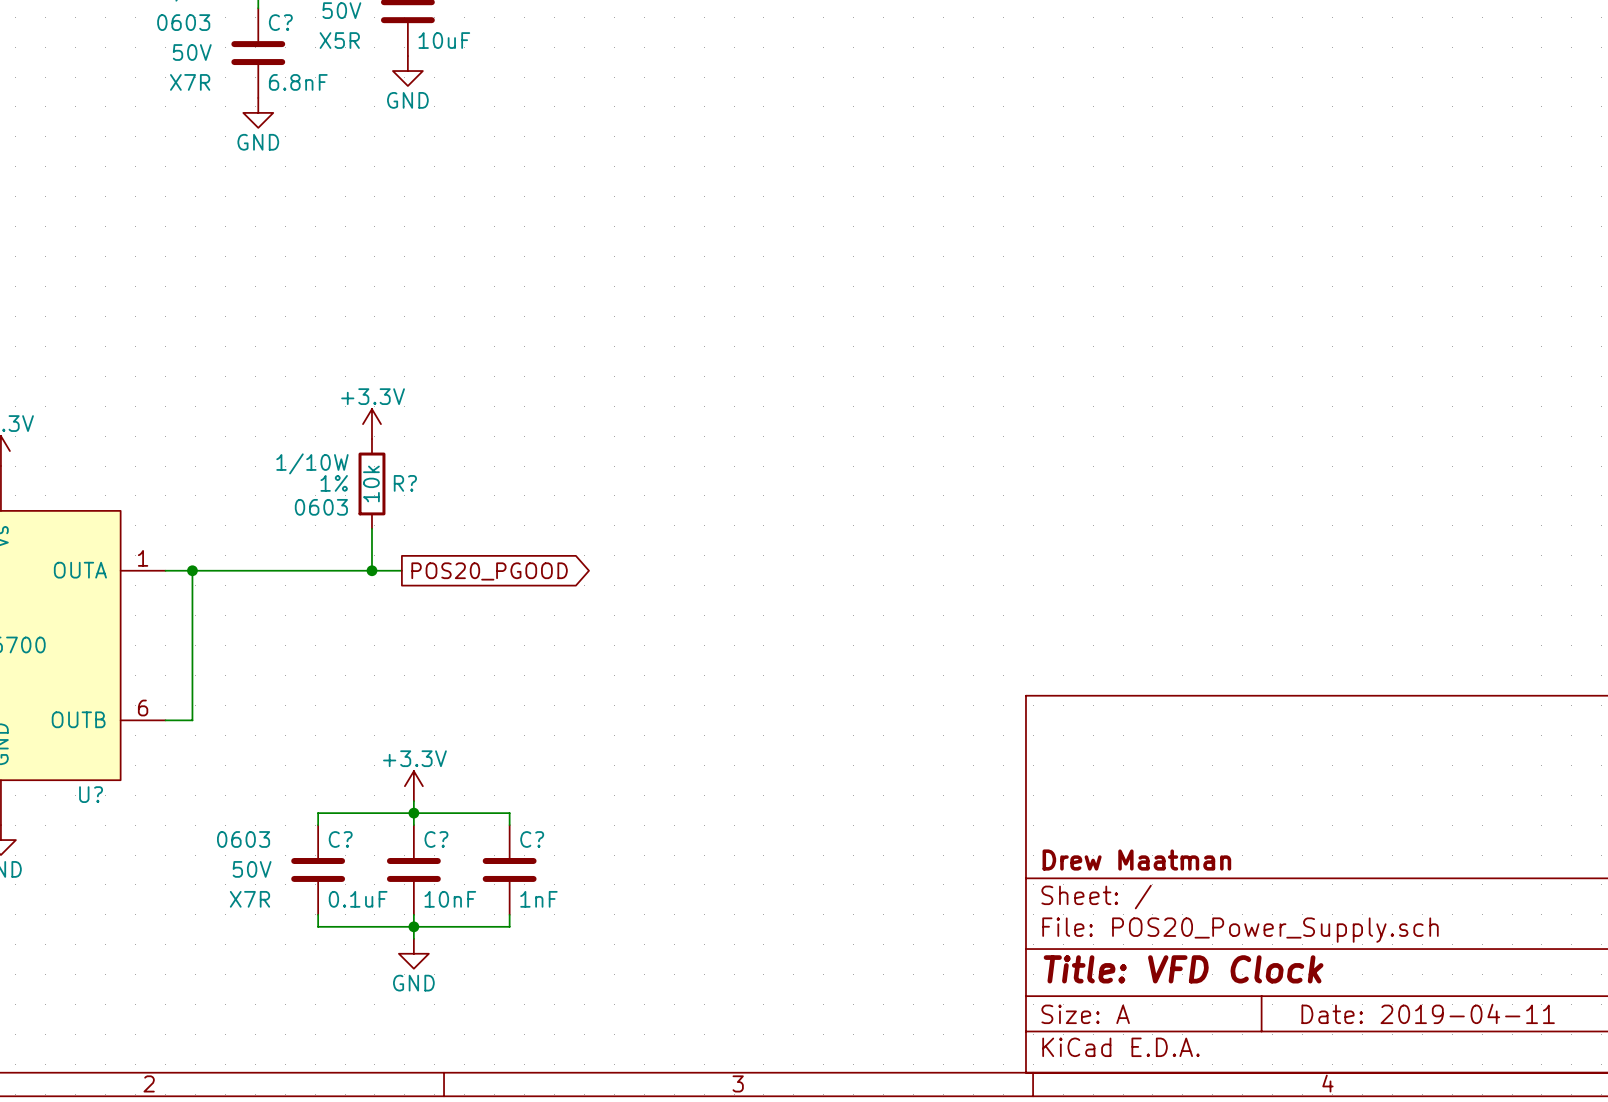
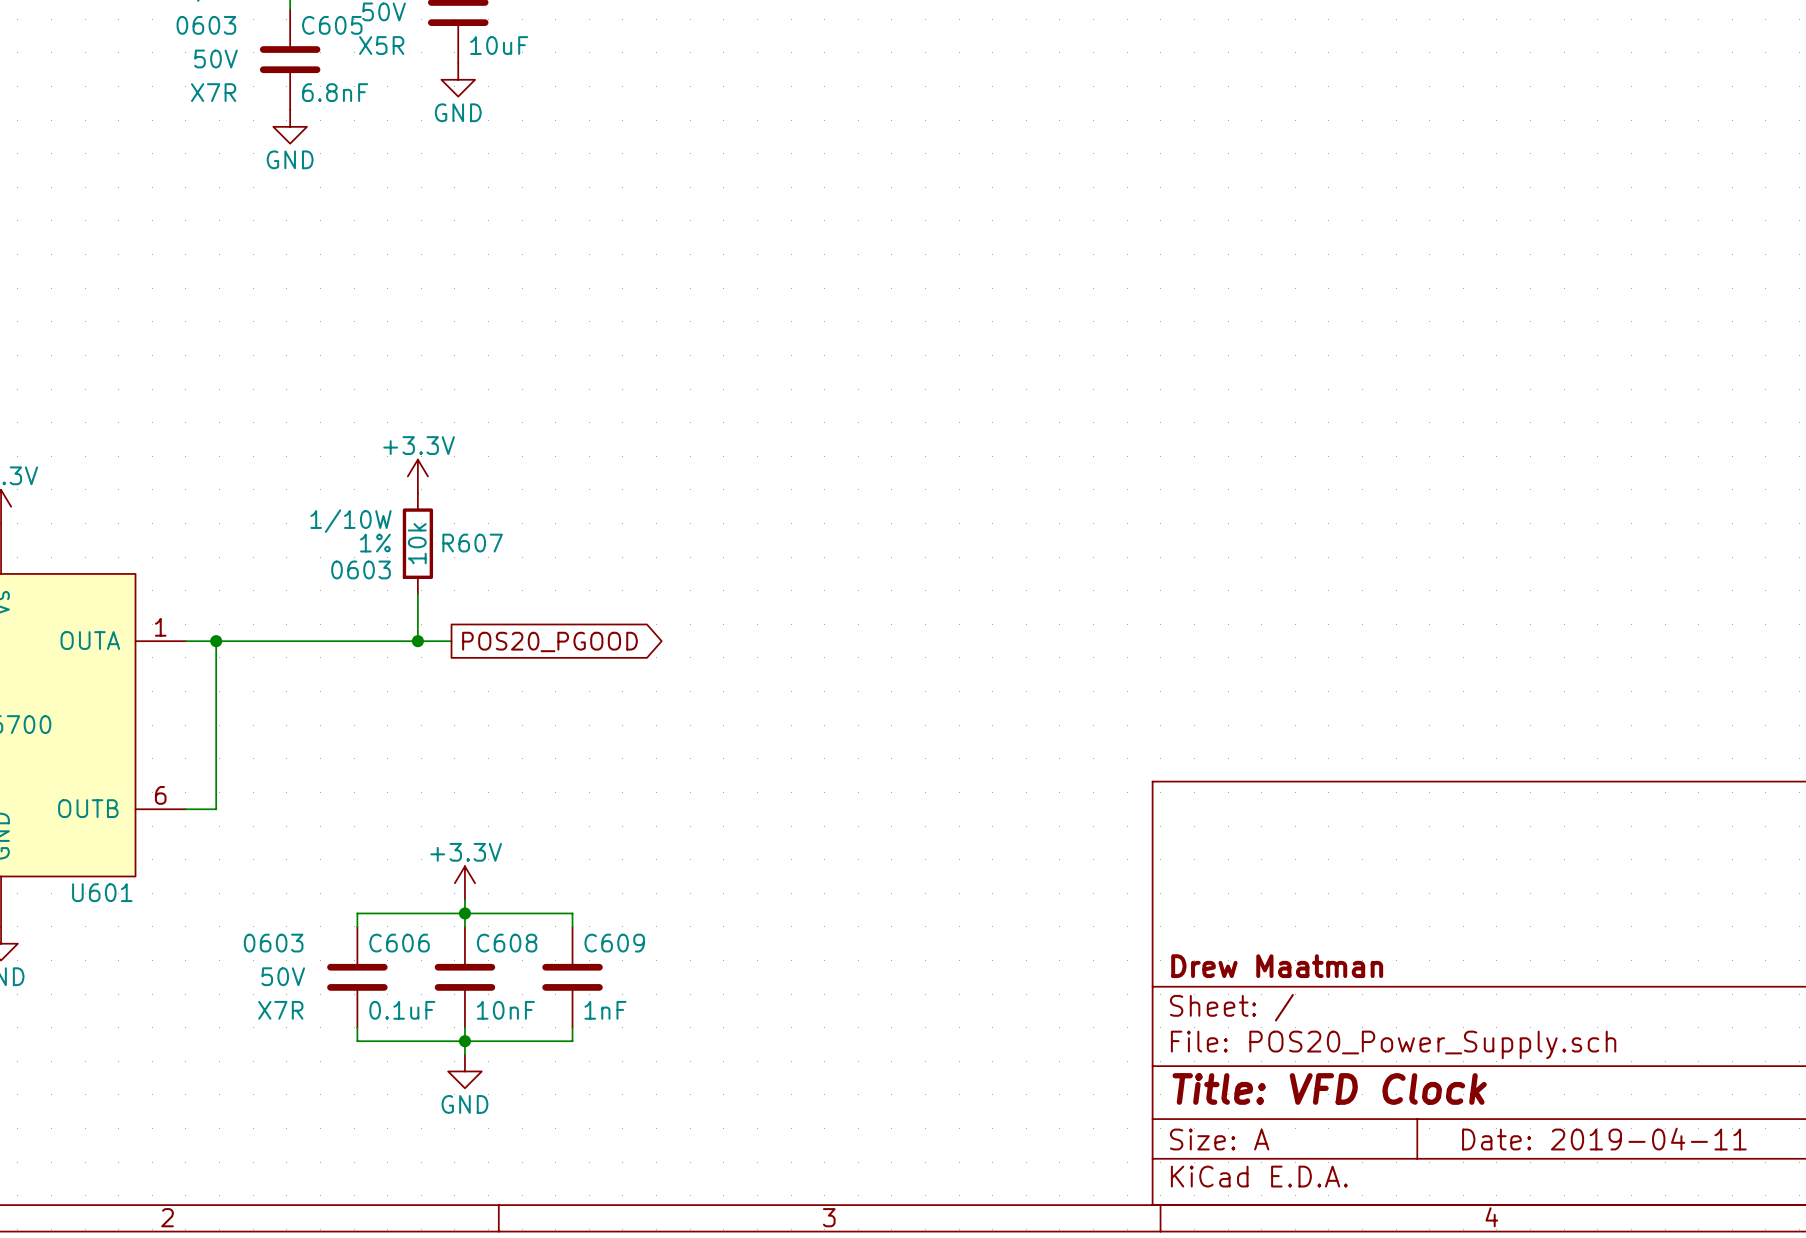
C? name: C? (280, 22) -> C605 (332, 25)
R? name: R? (405, 483) -> R607 (472, 543)
U? name: U? (91, 794) -> U601 (102, 892)
C? name: C? (340, 839) -> C606 (399, 943)
C? name: C? (436, 839) -> C608 (507, 943)
C? name: C? (532, 839) -> C609 (614, 943)

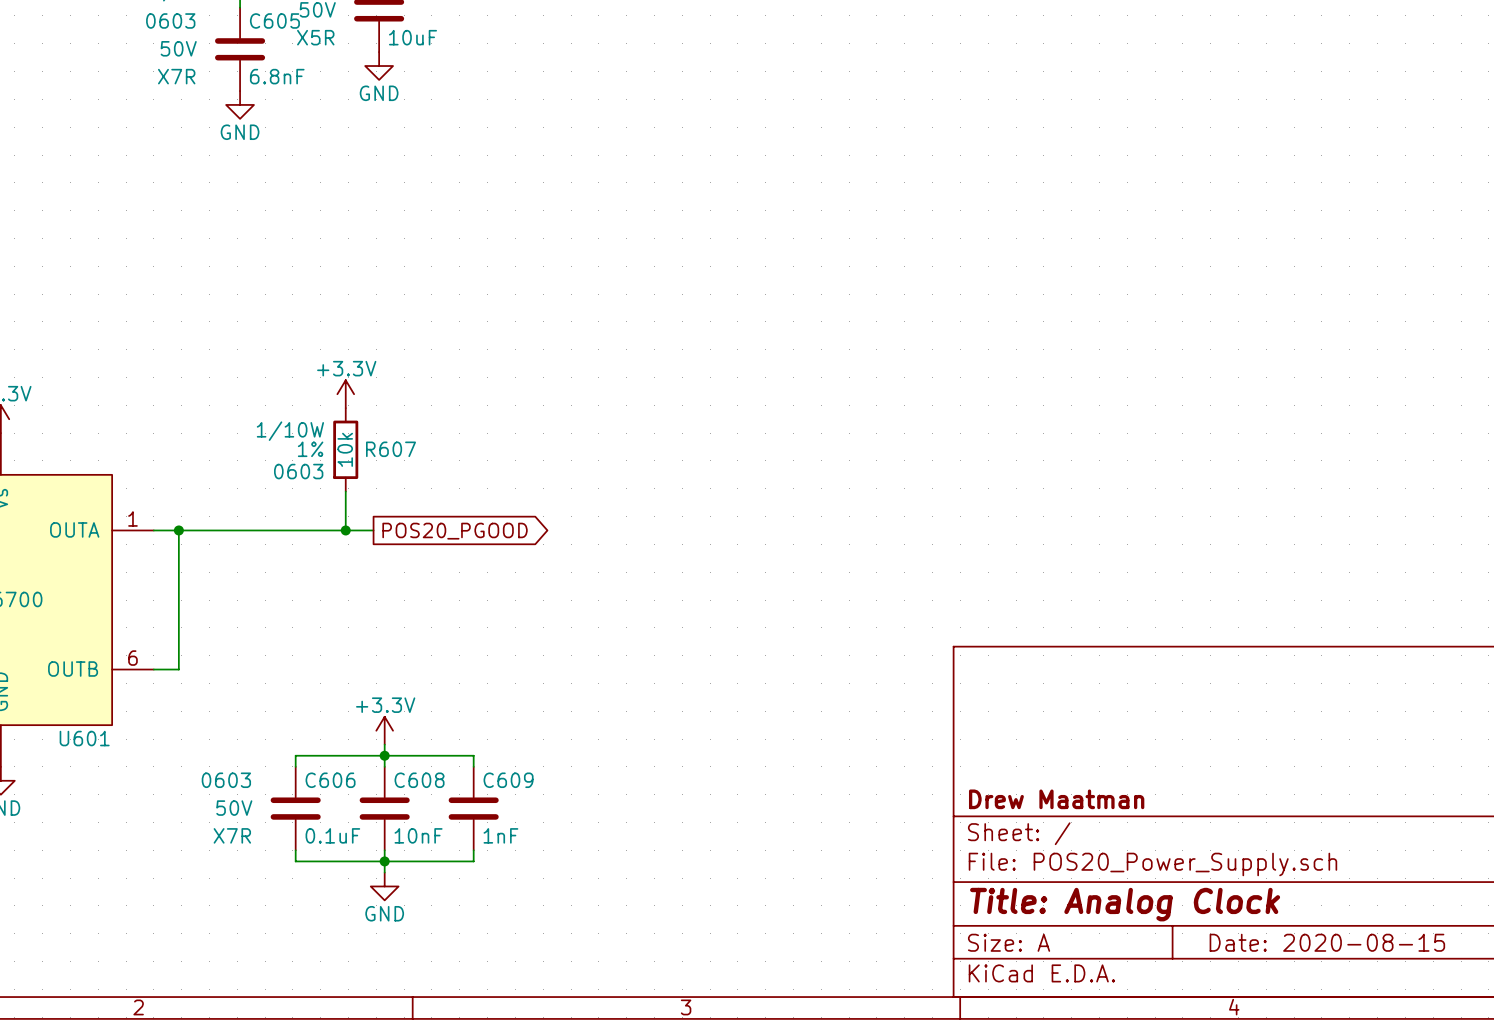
title block: Title: VFD Clock (1329, 1088) -> Title: Analog Clock (1125, 904)
title block: Date: 2019-04-11 (1604, 1139) -> Date: 2020-08-15 (1327, 942)

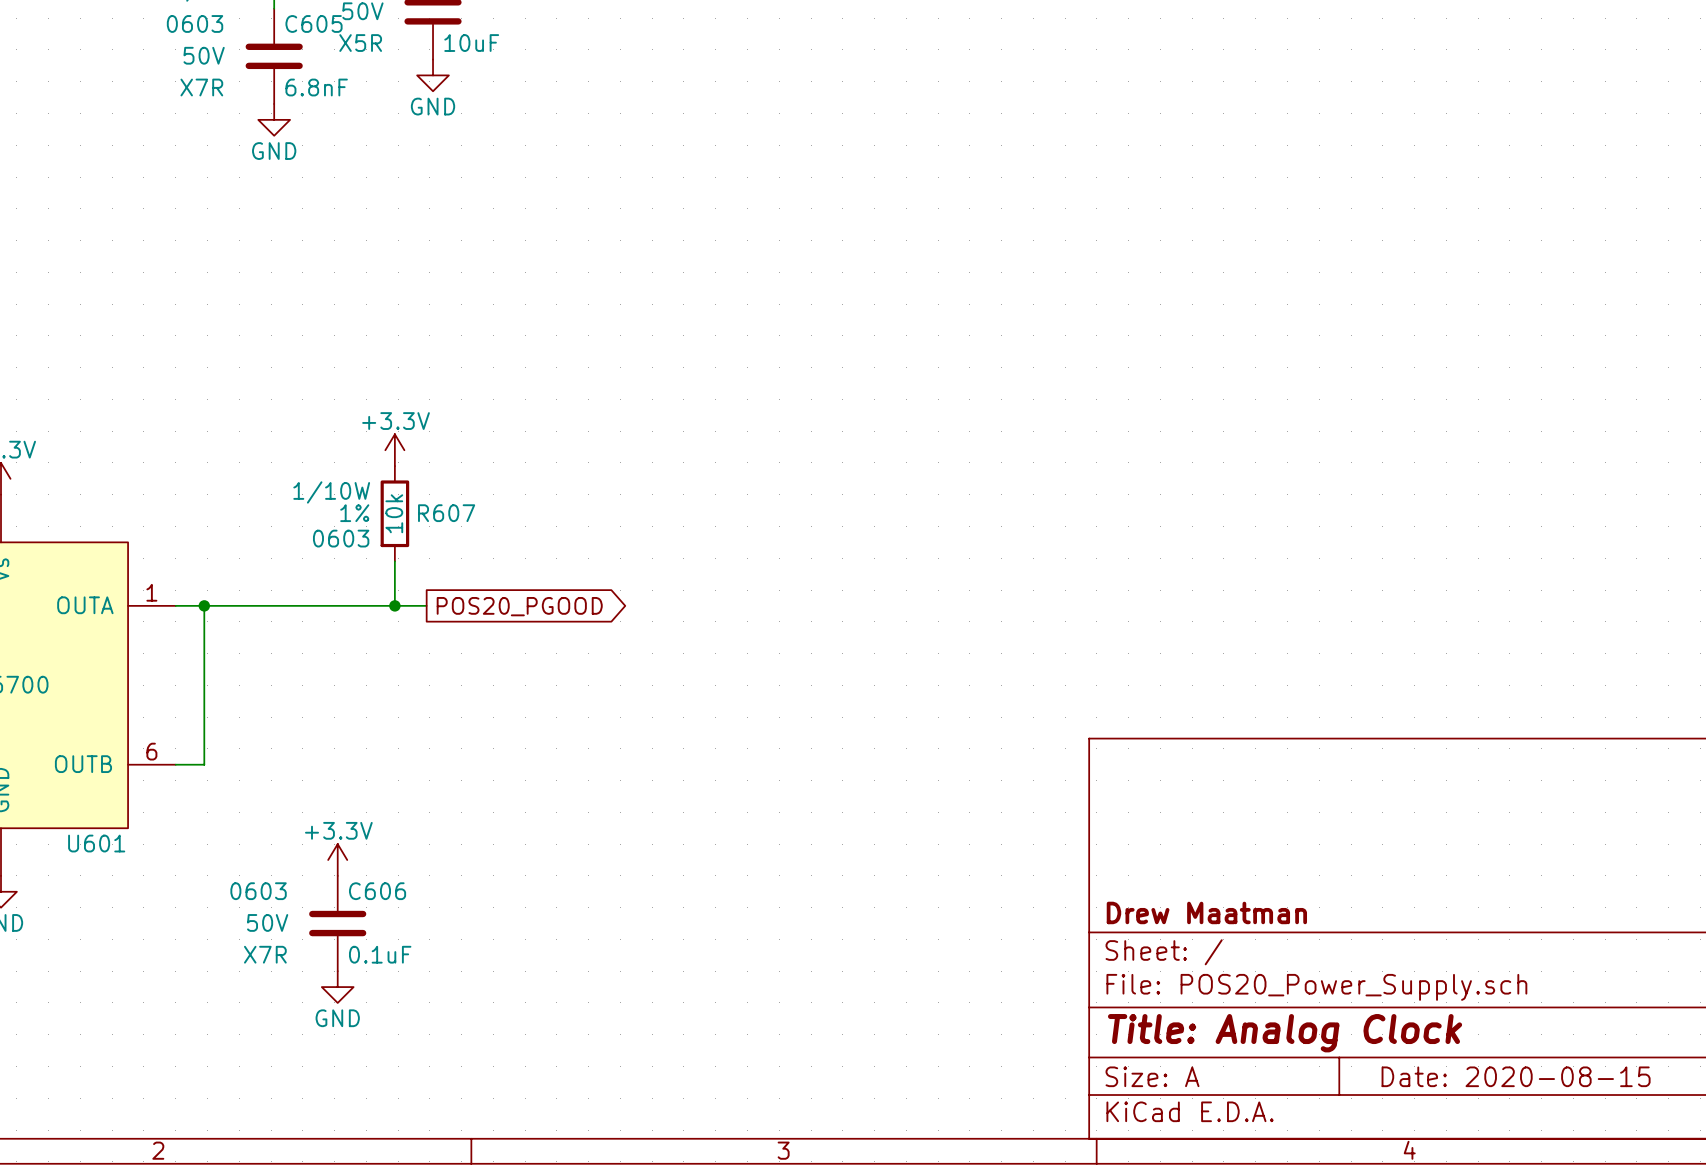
power symbol position: +3.3V (384, 730) -> +3.3V (337, 860)
wire: (384, 744) (384, 766) -> none
junction: (384, 755) -> none
wire: (295, 766) (295, 755) (473, 755) (473, 766) -> none
C608: 10nF (384, 808) -> none
C609: 1nF (473, 808) -> none
wire: (295, 850) (295, 861) (473, 861) (473, 850) -> none
wire: (384, 850) (384, 872) -> none
junction: (384, 861) -> none
power symbol position: GND (384, 886) -> GND (337, 987)

